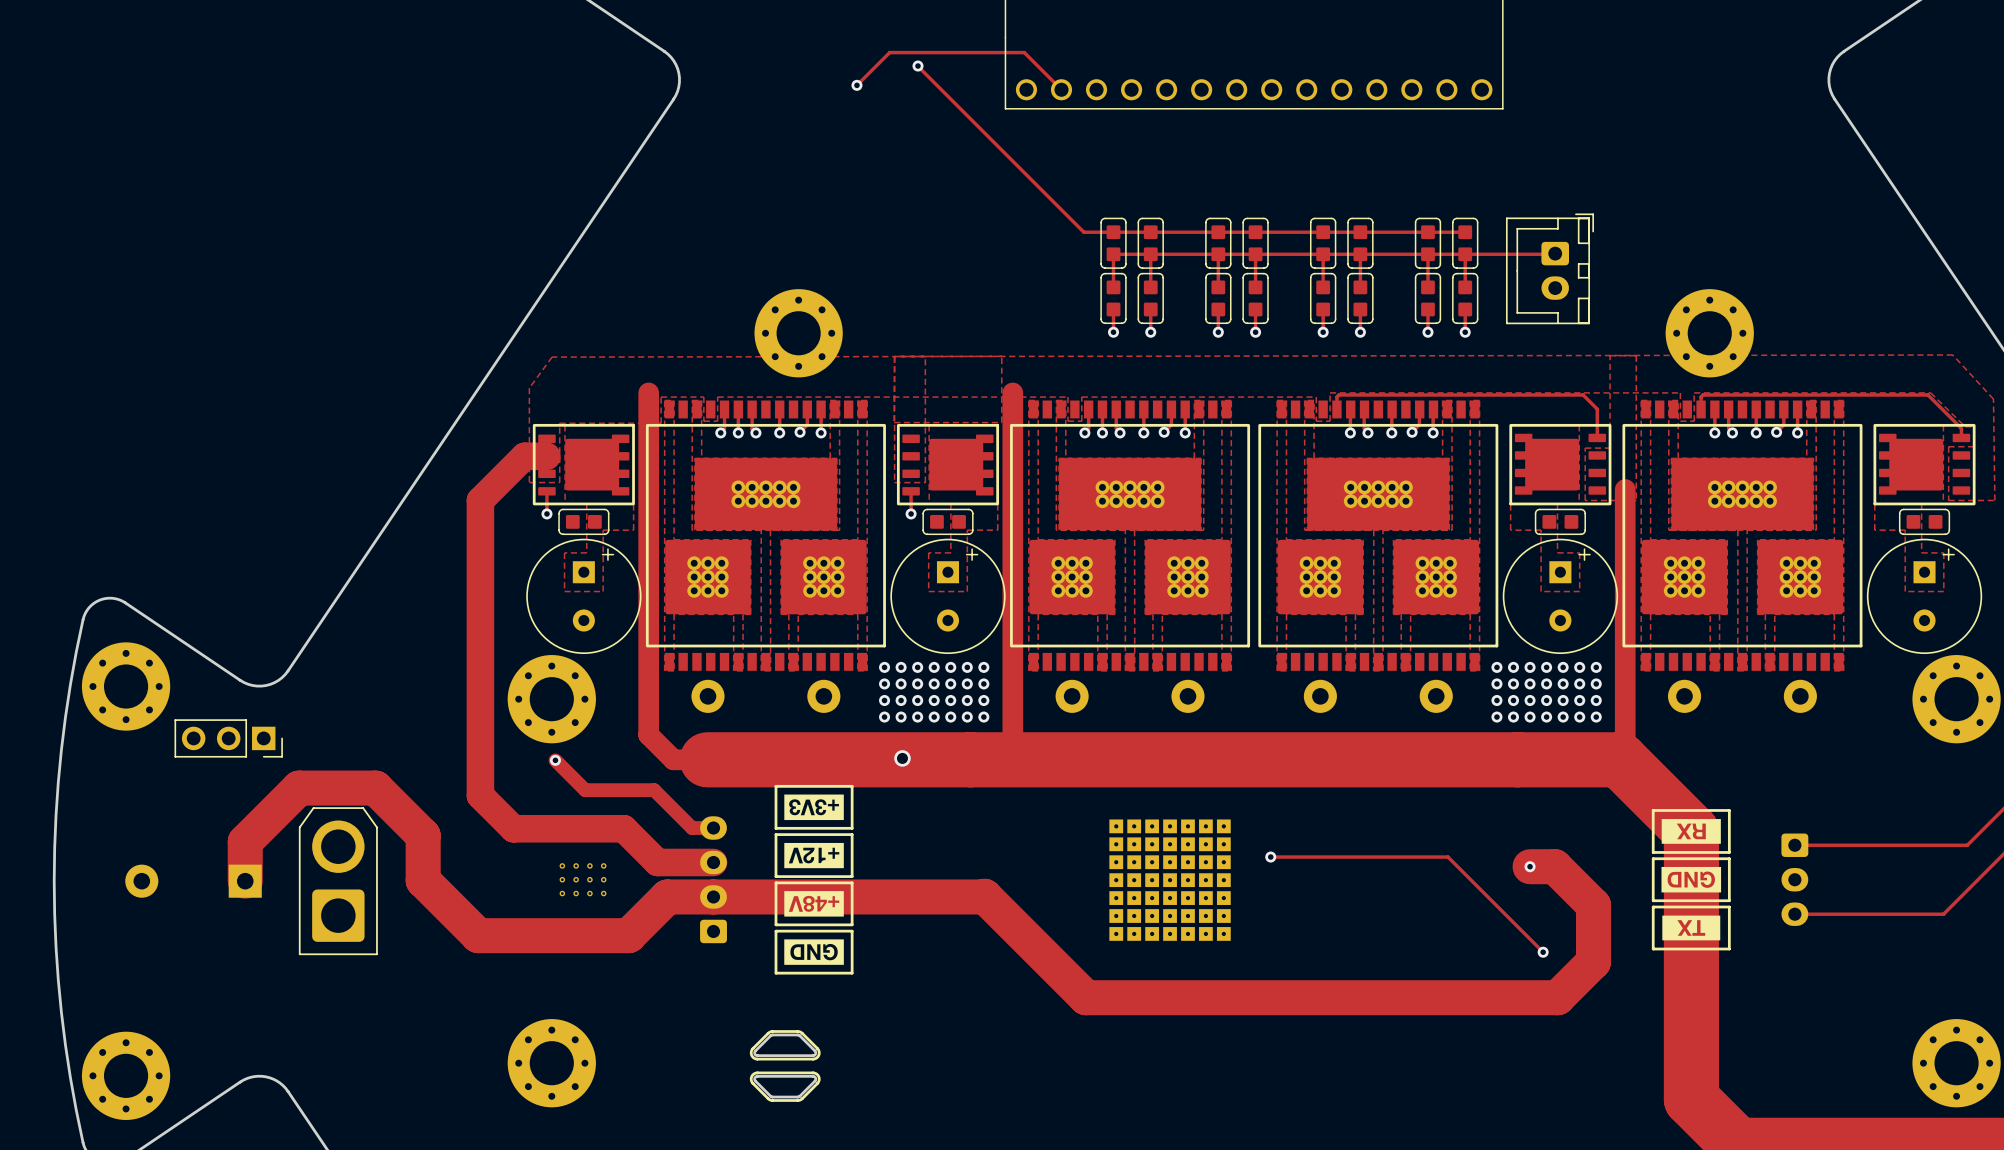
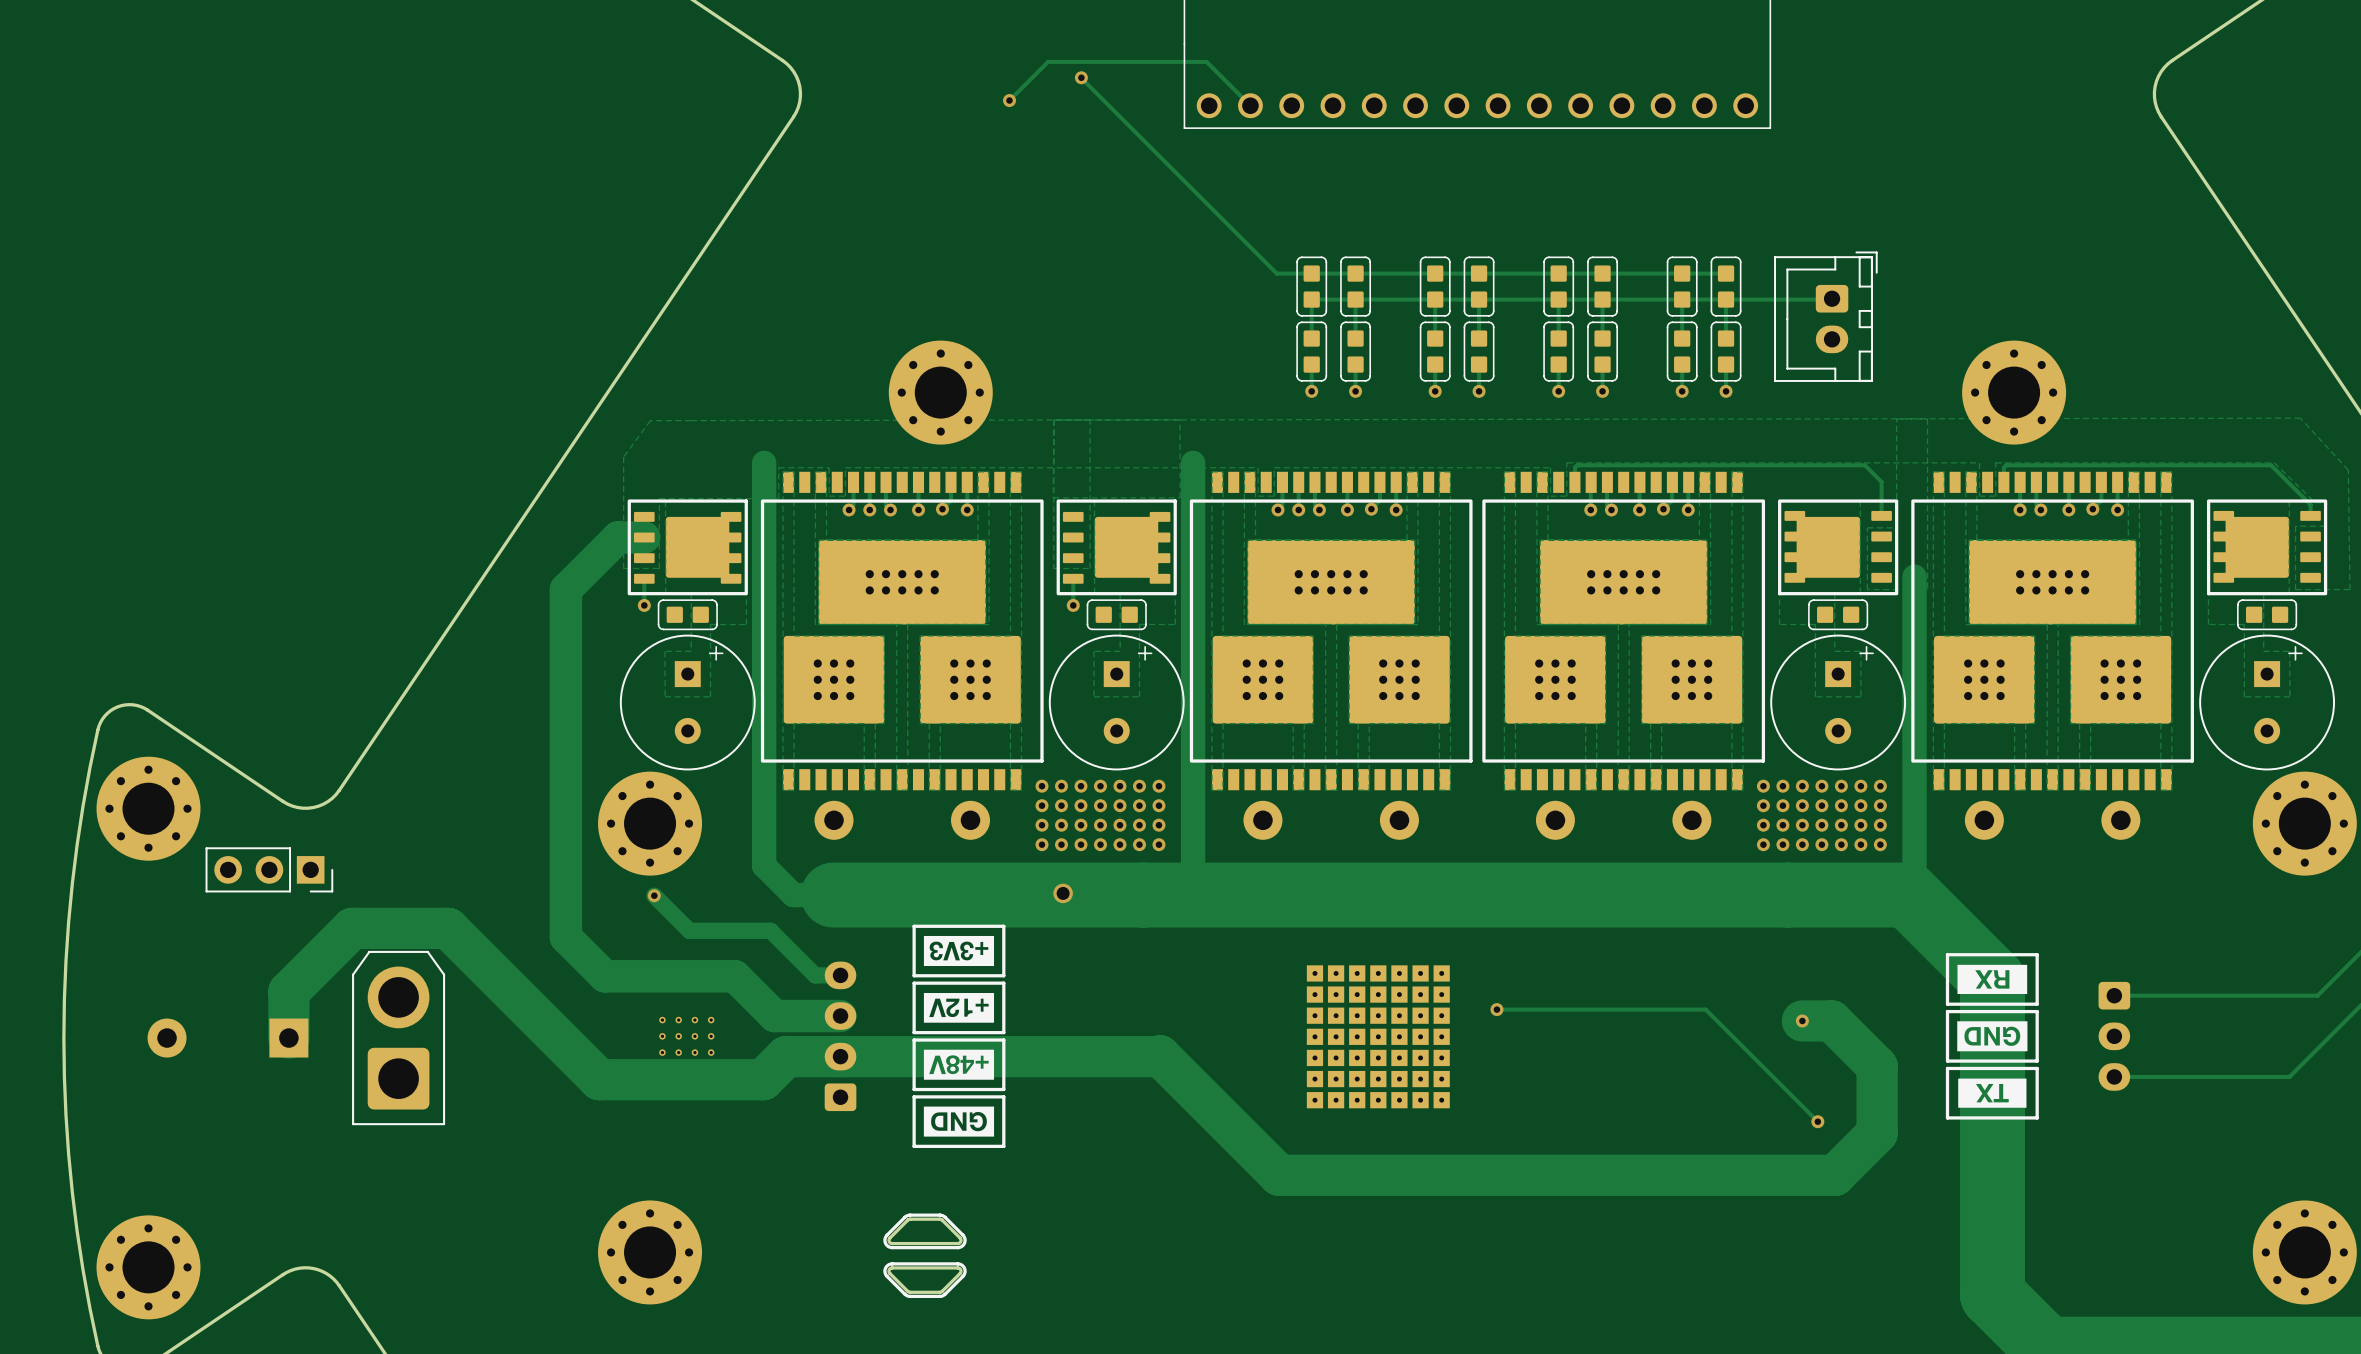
track: (375, 788) (423, 835) (423, 880) (478, 935) (628, 935) (647, 916) -> (442, 928) (448, 928) (599, 1079) (763, 1079)

